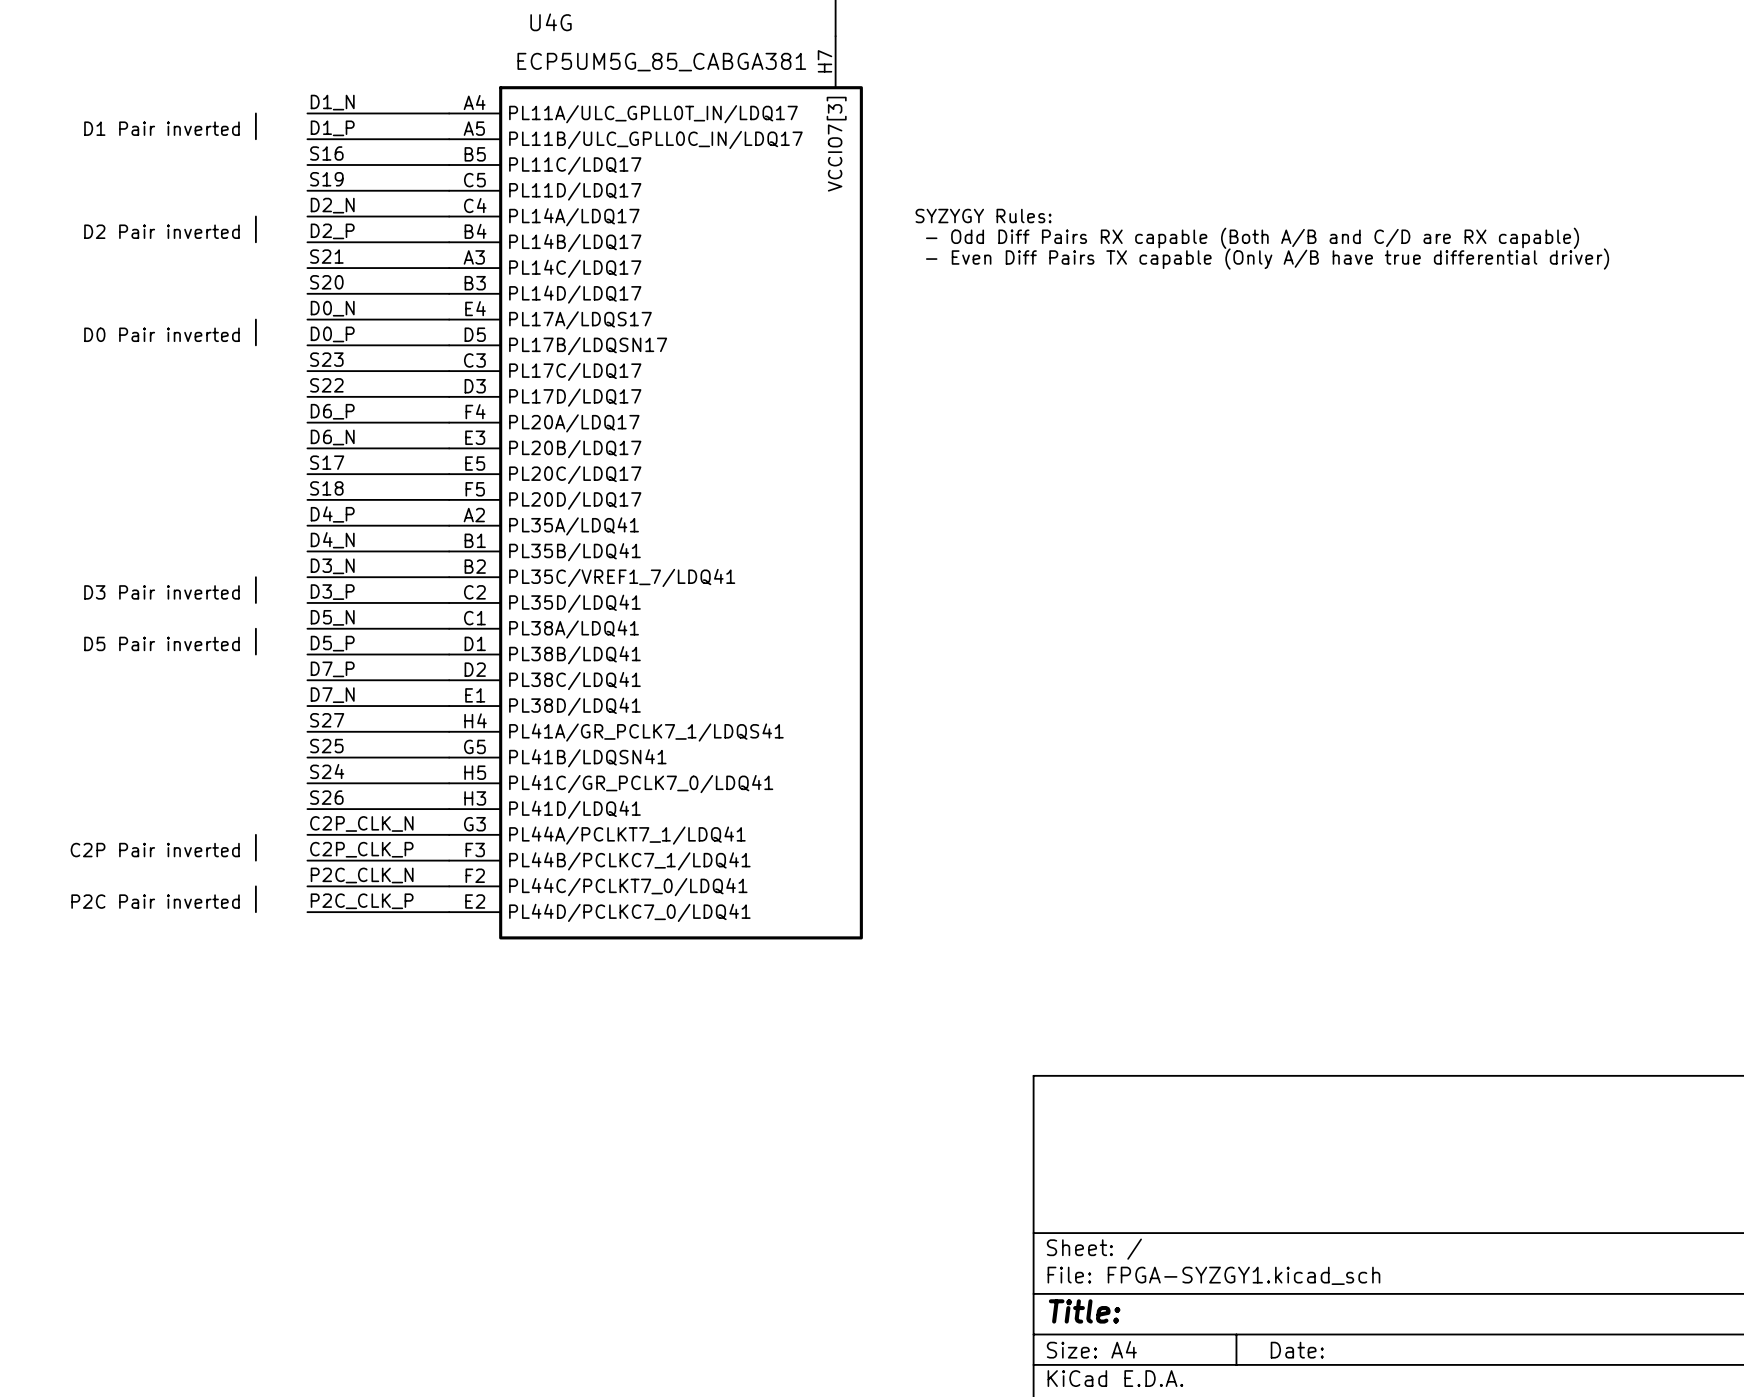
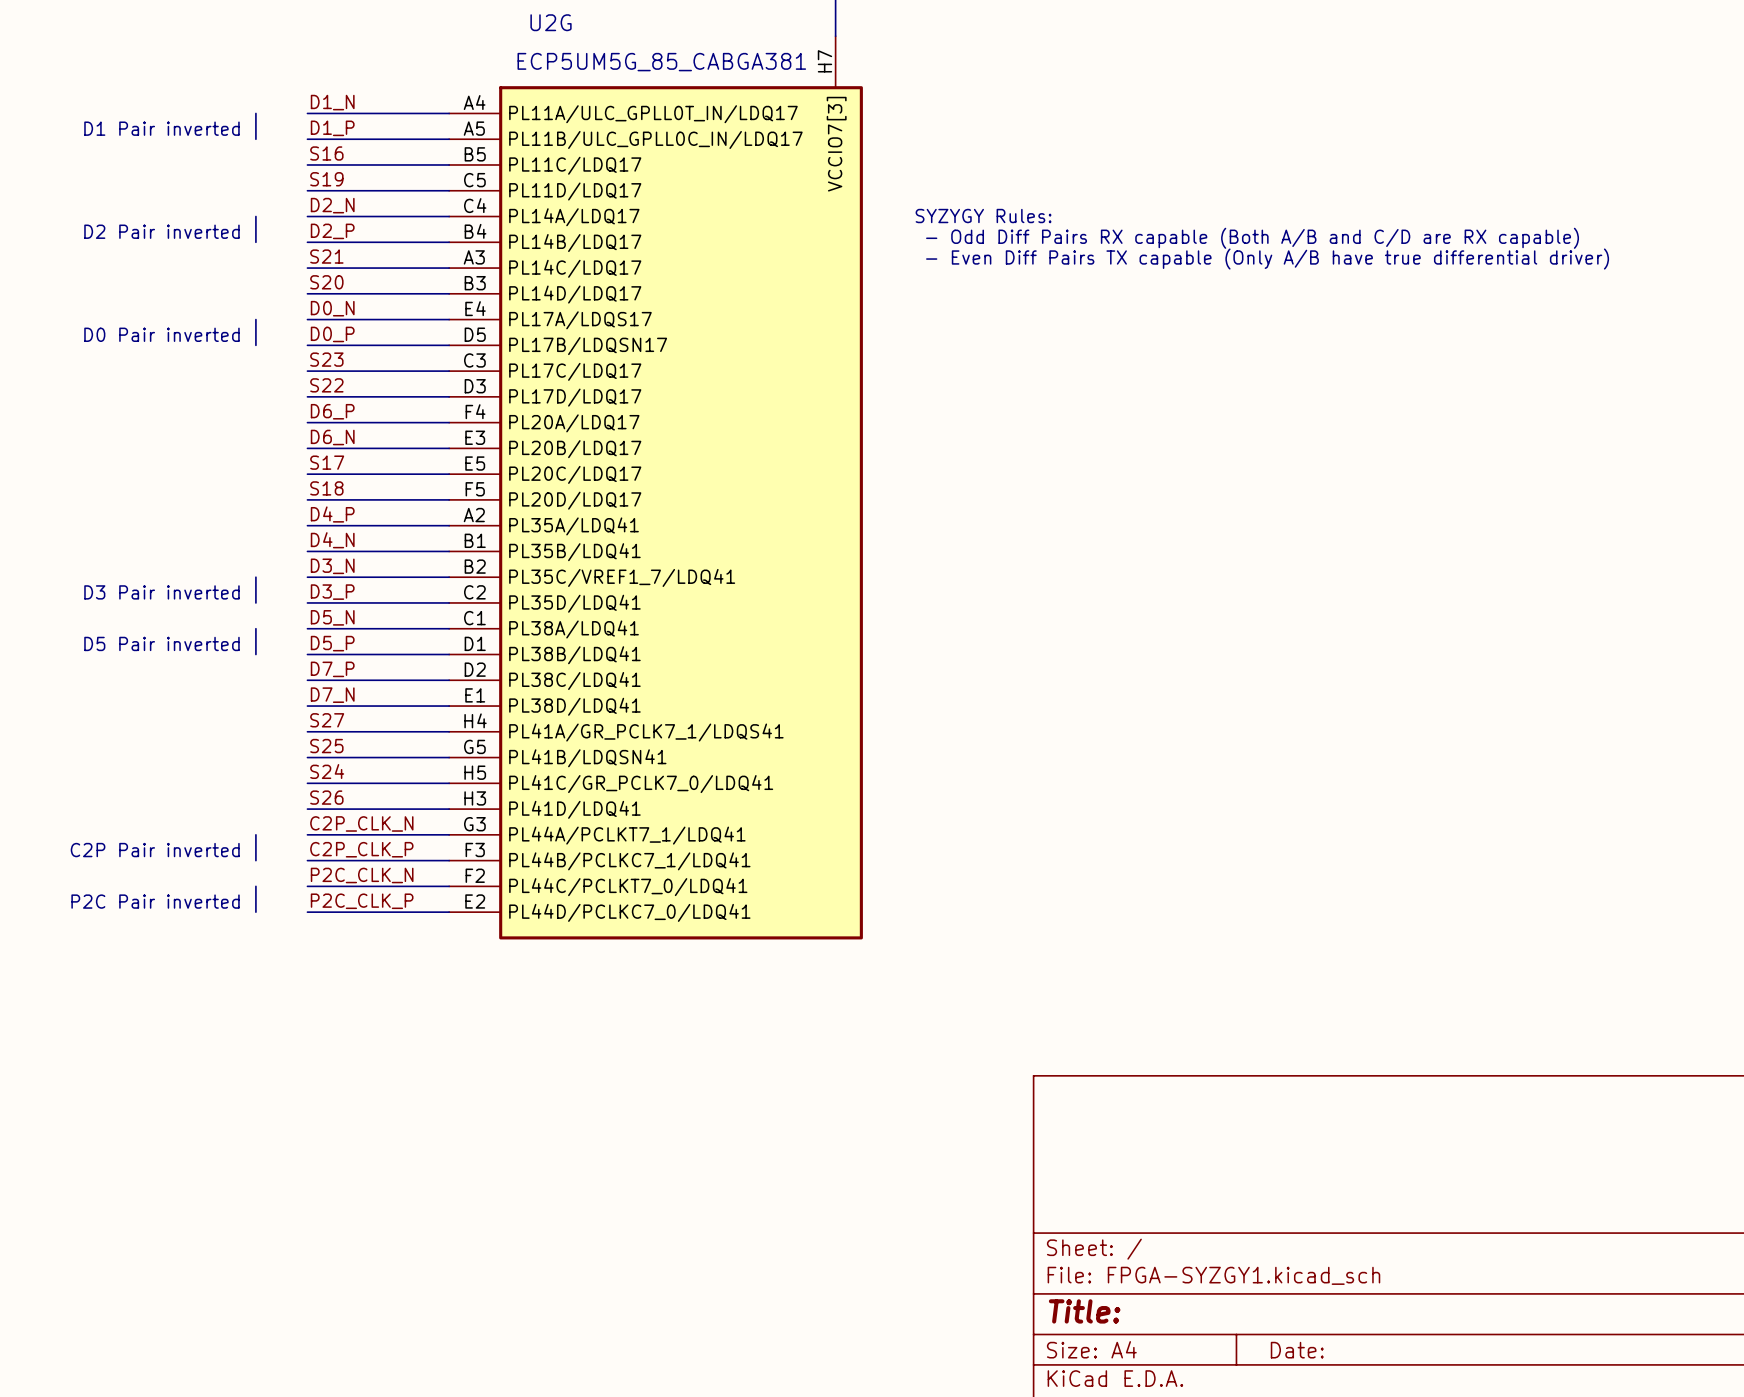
U4G name: U4G (551, 22) -> U2G (551, 22)

